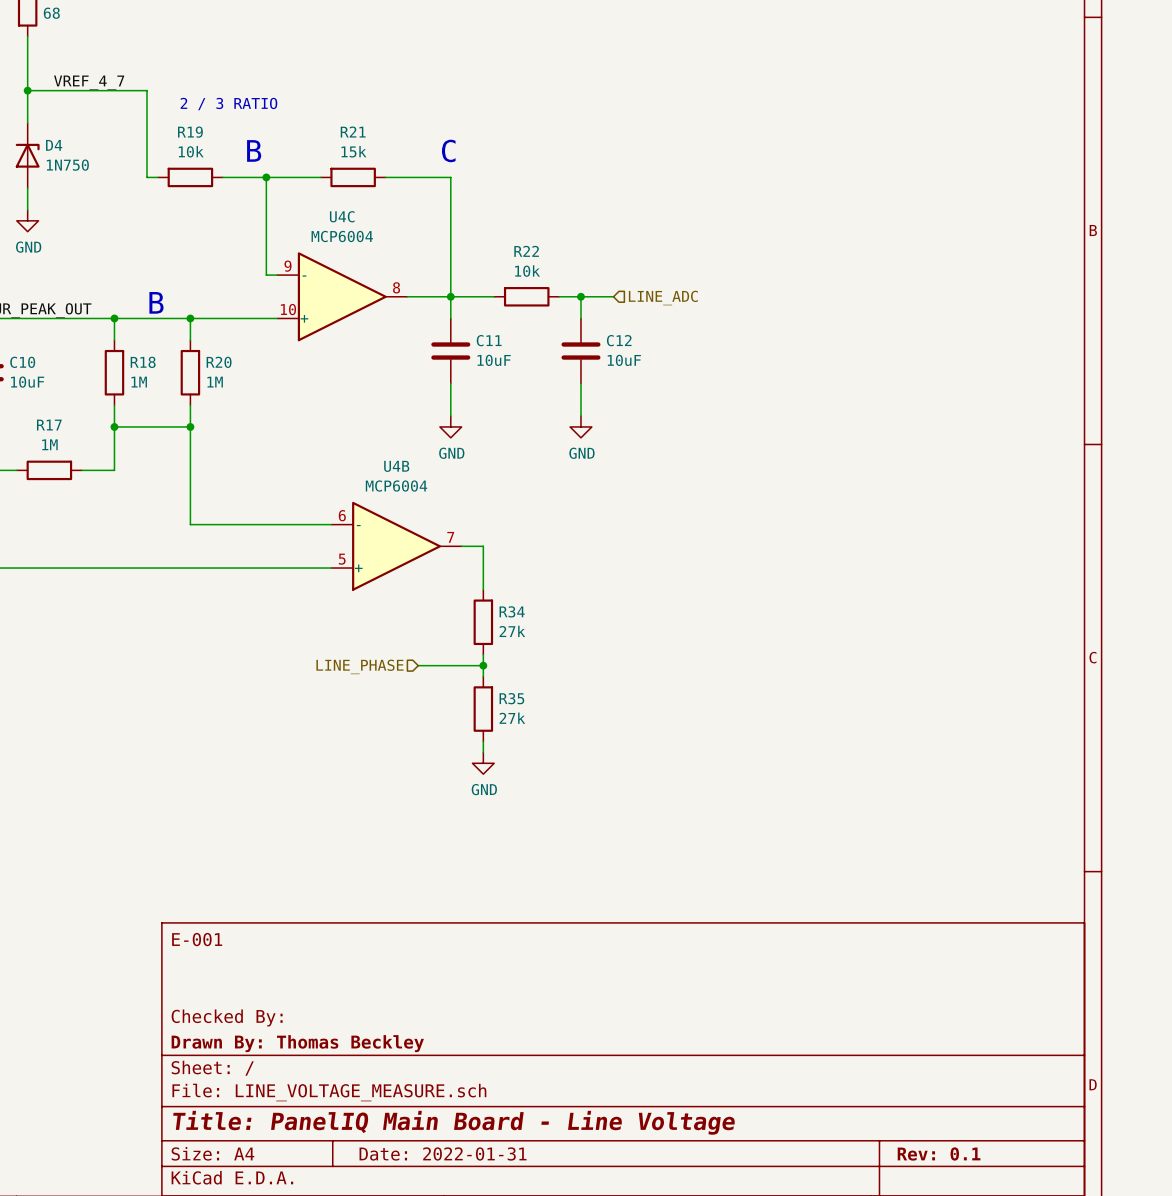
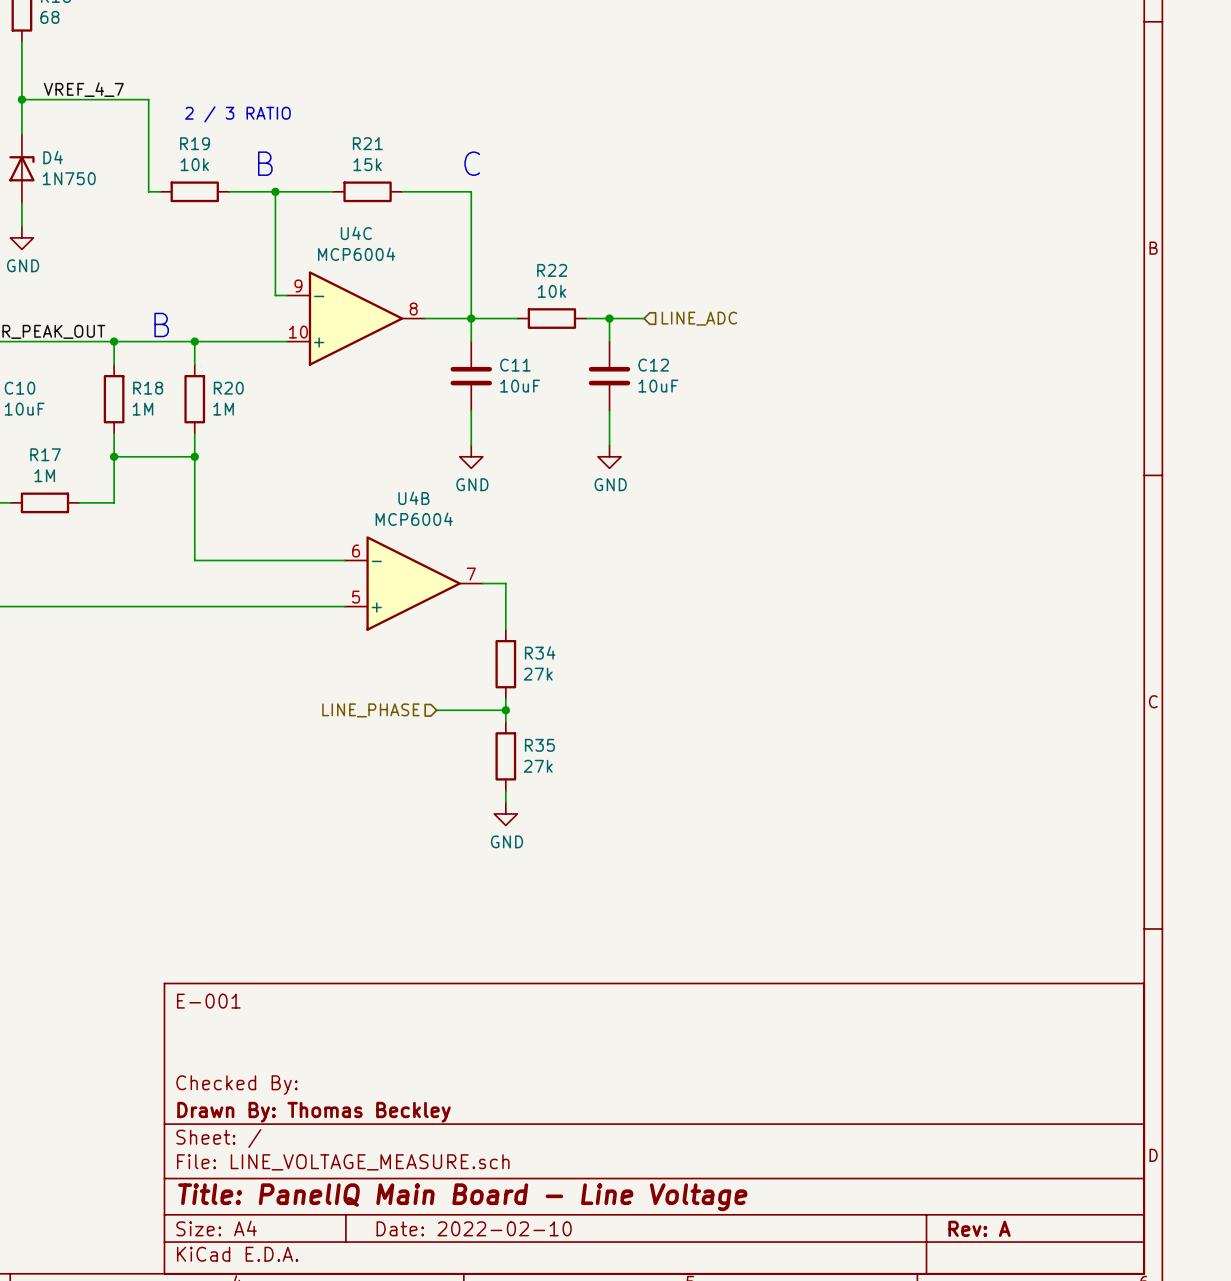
title block: Date: 2022-01-31 (443, 1153) -> Date: 2022-02-10 (474, 1228)
title block: Rev: 0.1 (939, 1153) -> Rev: A (979, 1228)

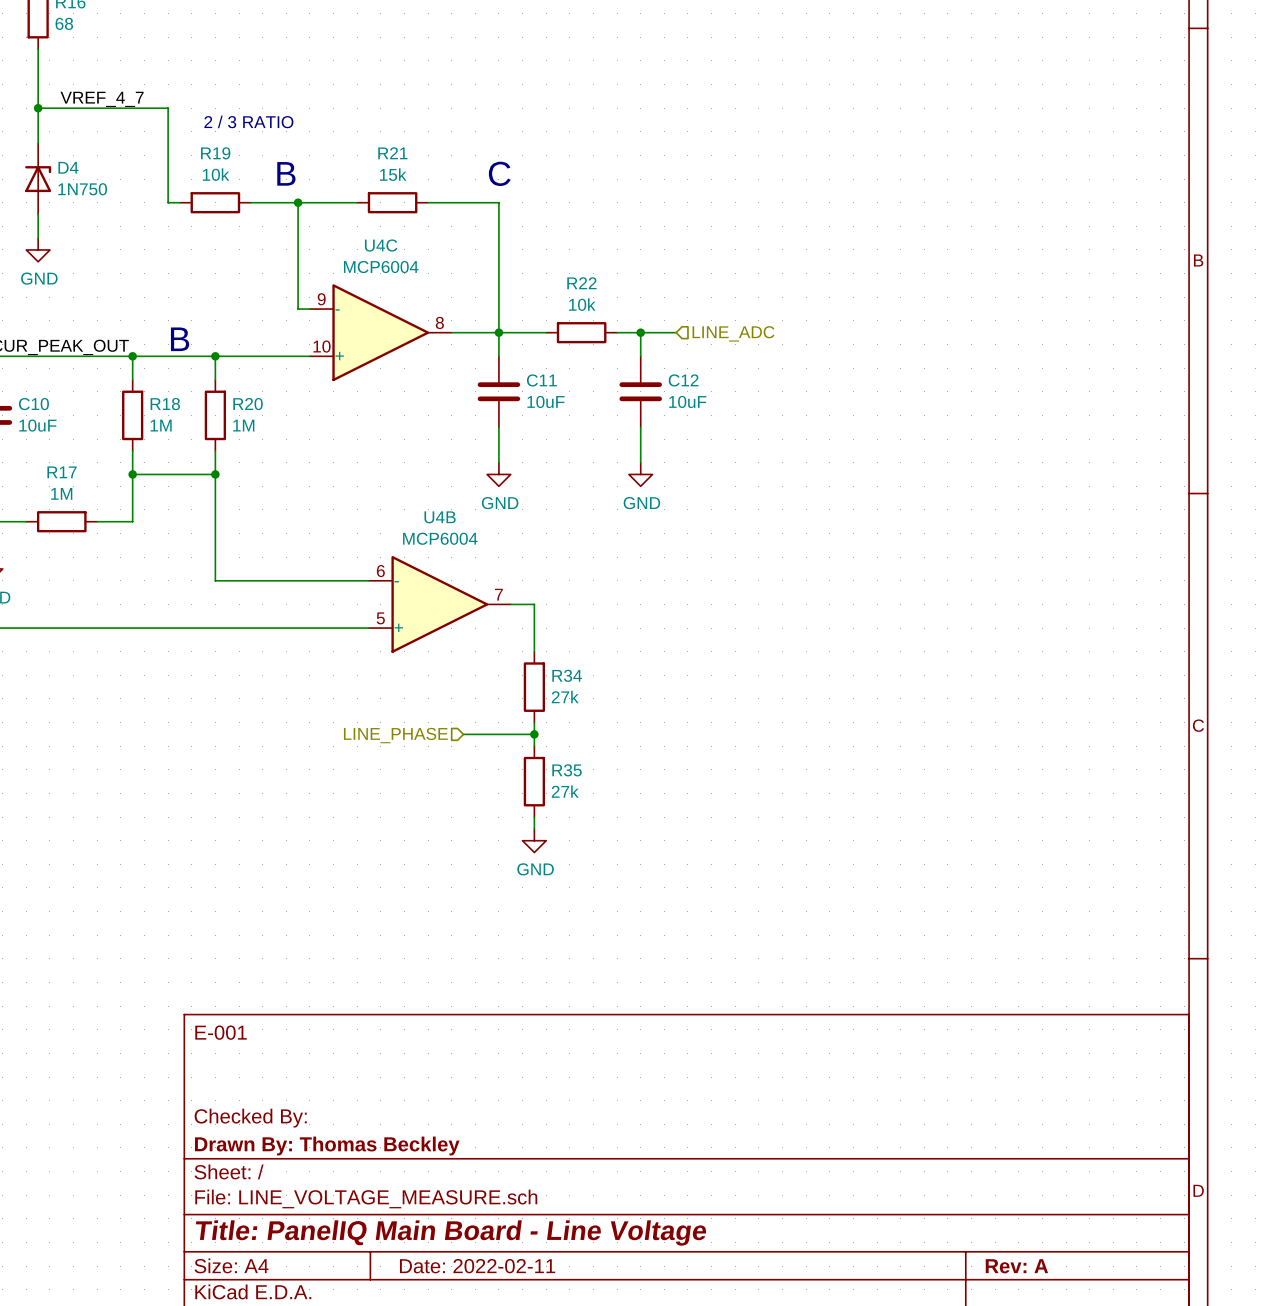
title block: Date: 2022-02-10 (474, 1228) -> Date: 2022-02-11 (477, 1266)

